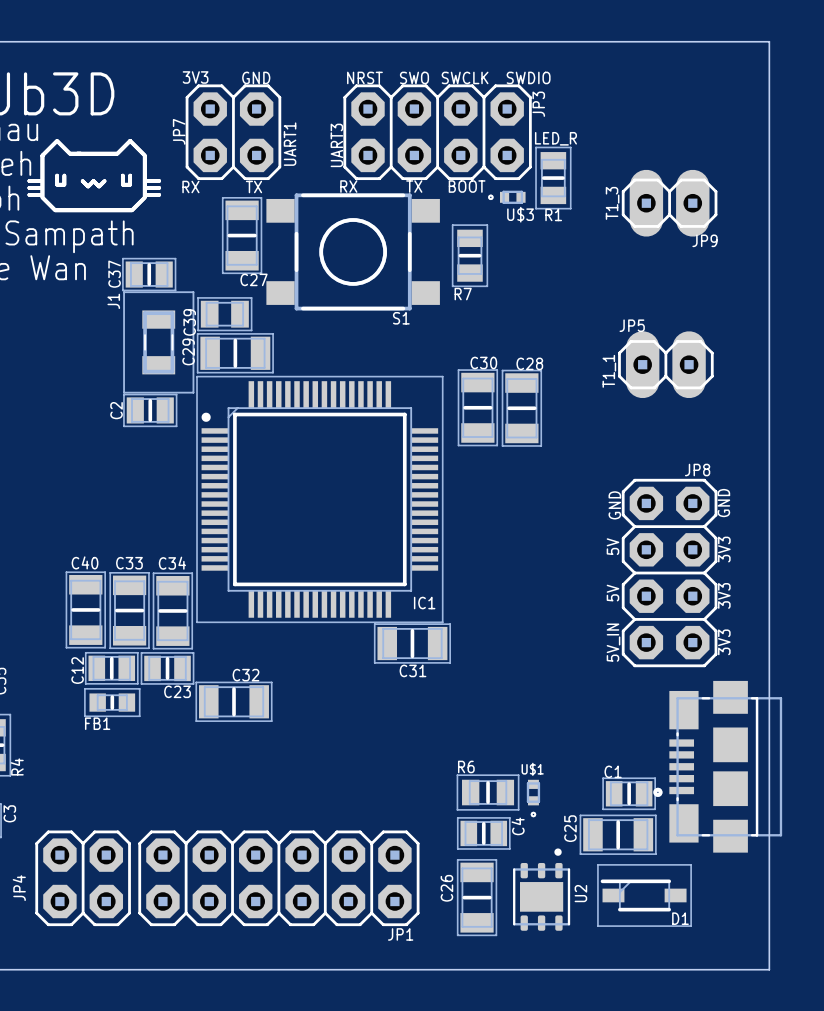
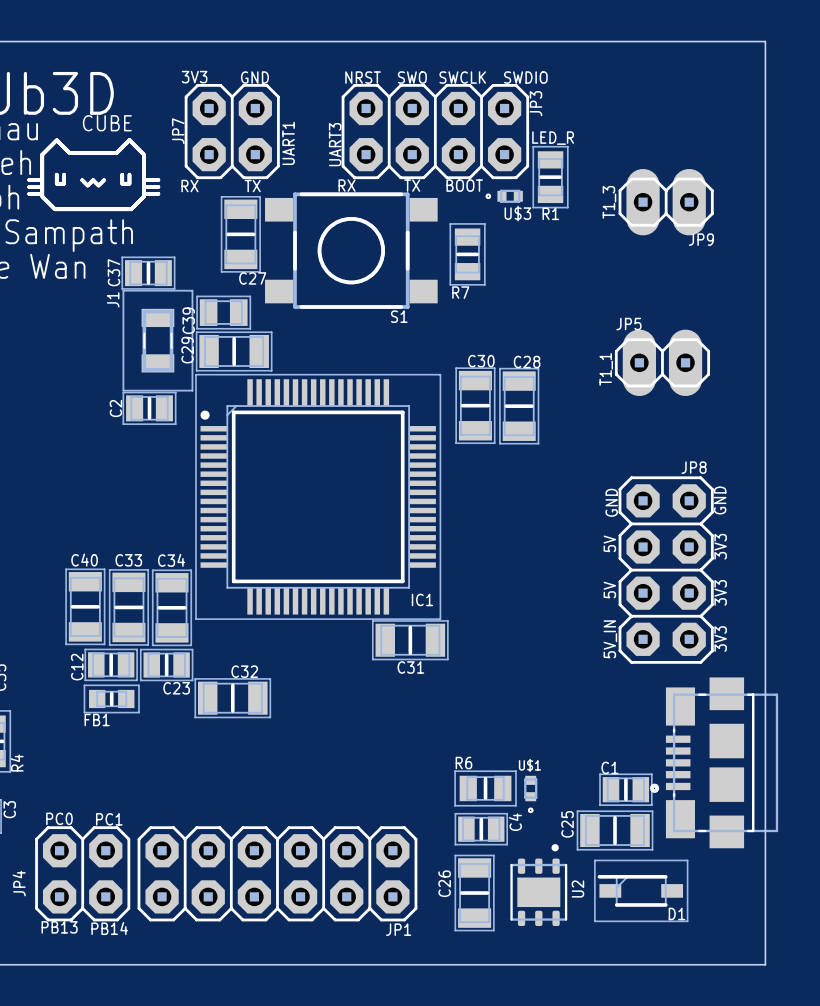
text: none -> CUBE (107, 123)
text: none -> PC0 (59, 818)
text: none -> PC1 (109, 819)
text: none -> PB13 (59, 927)
text: none -> PB14 (109, 928)

